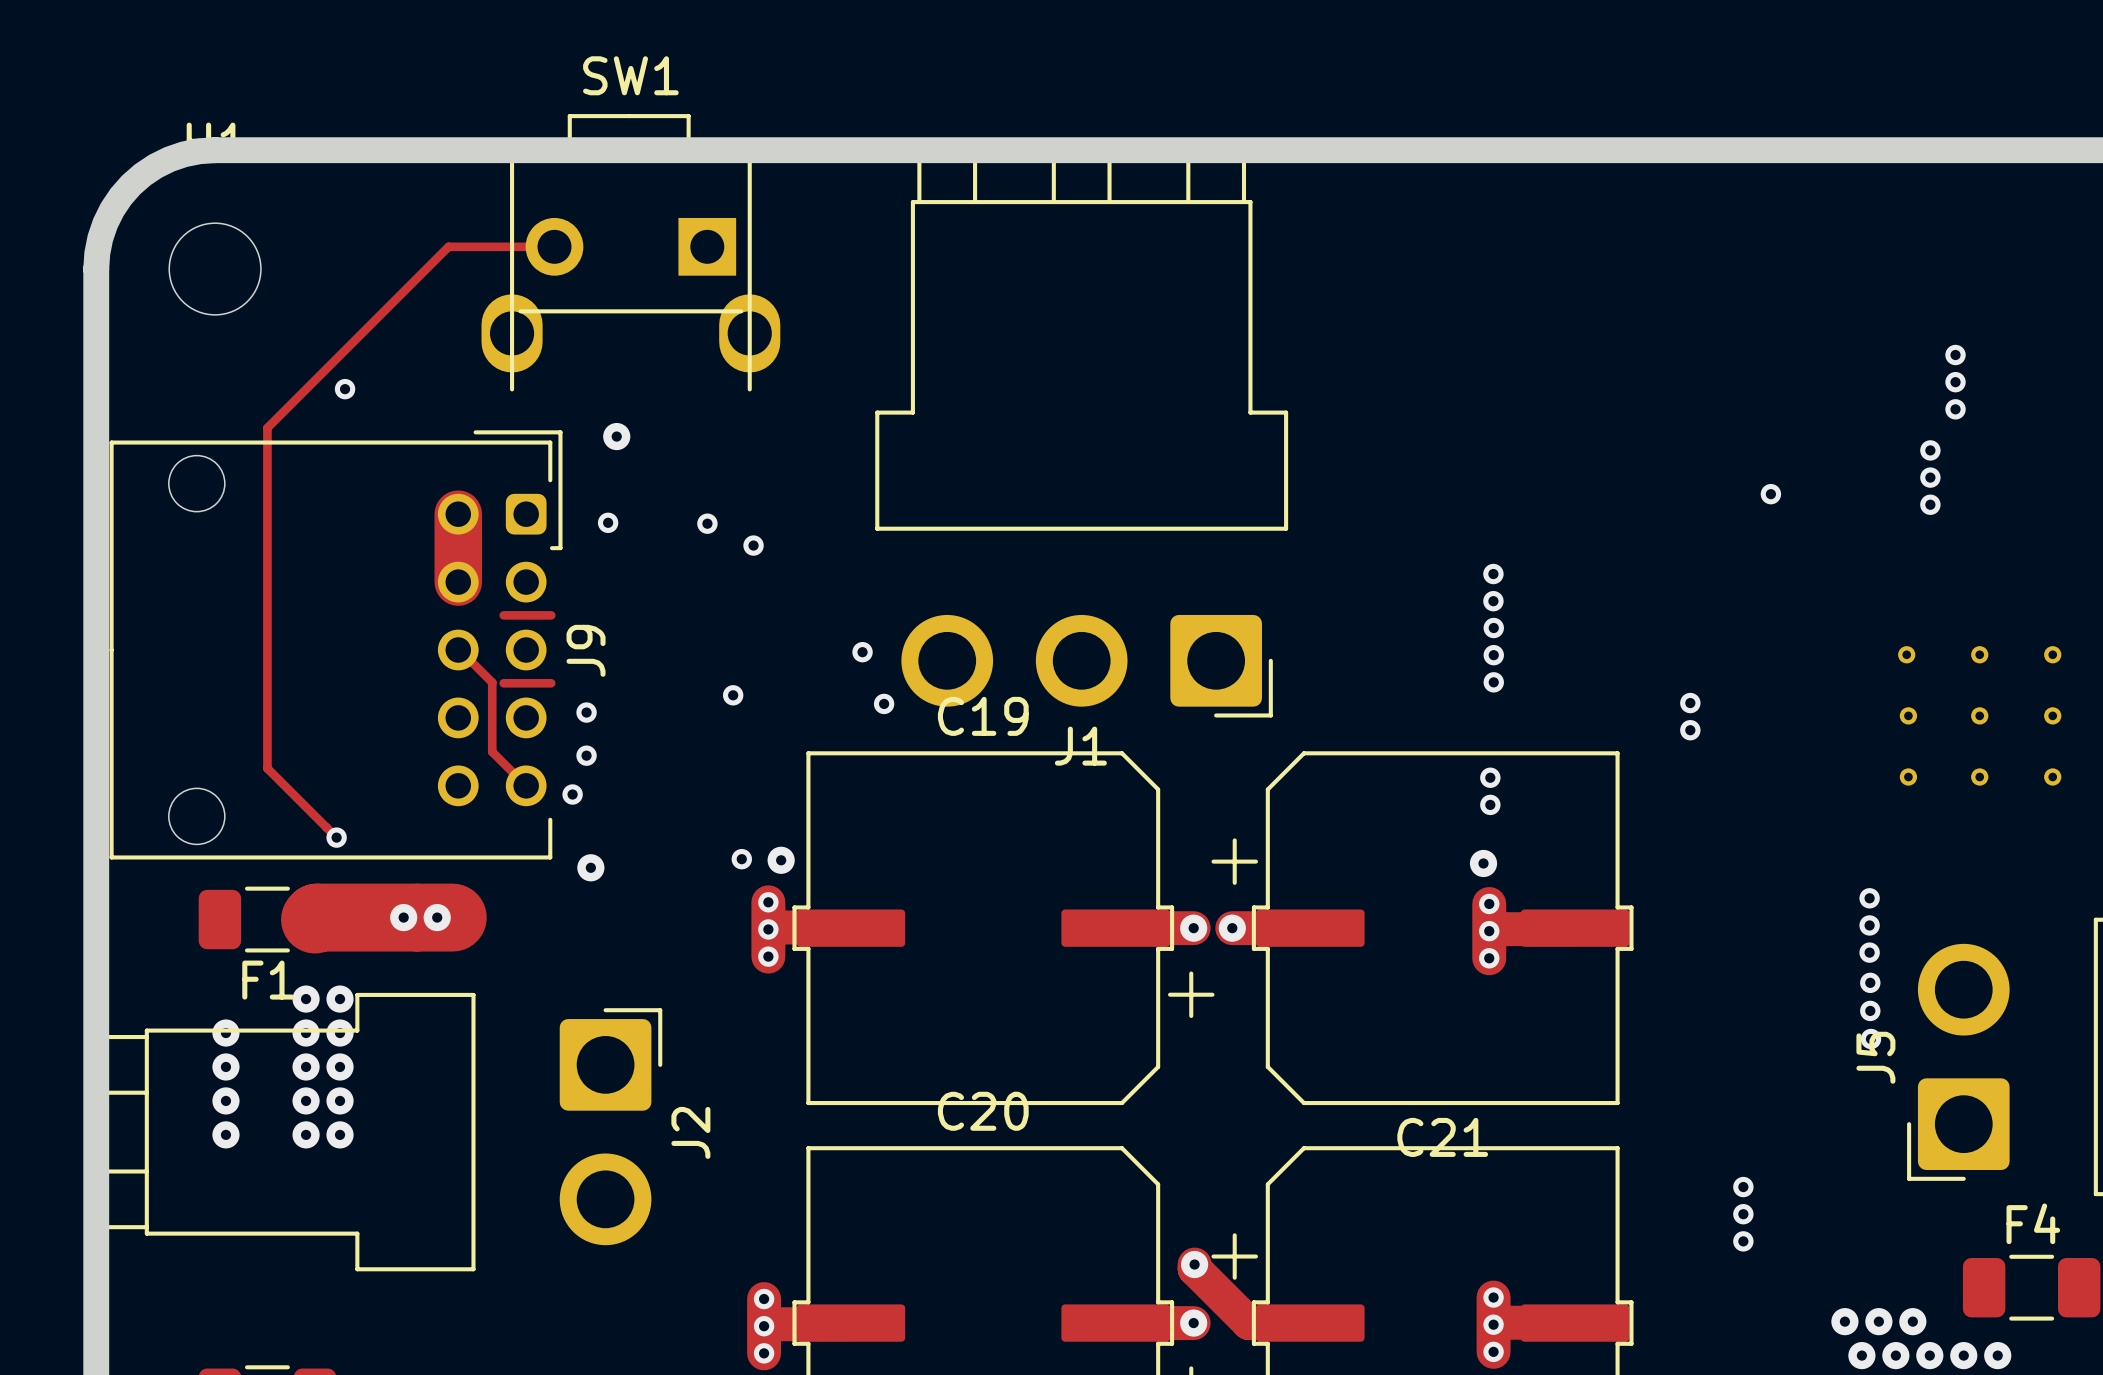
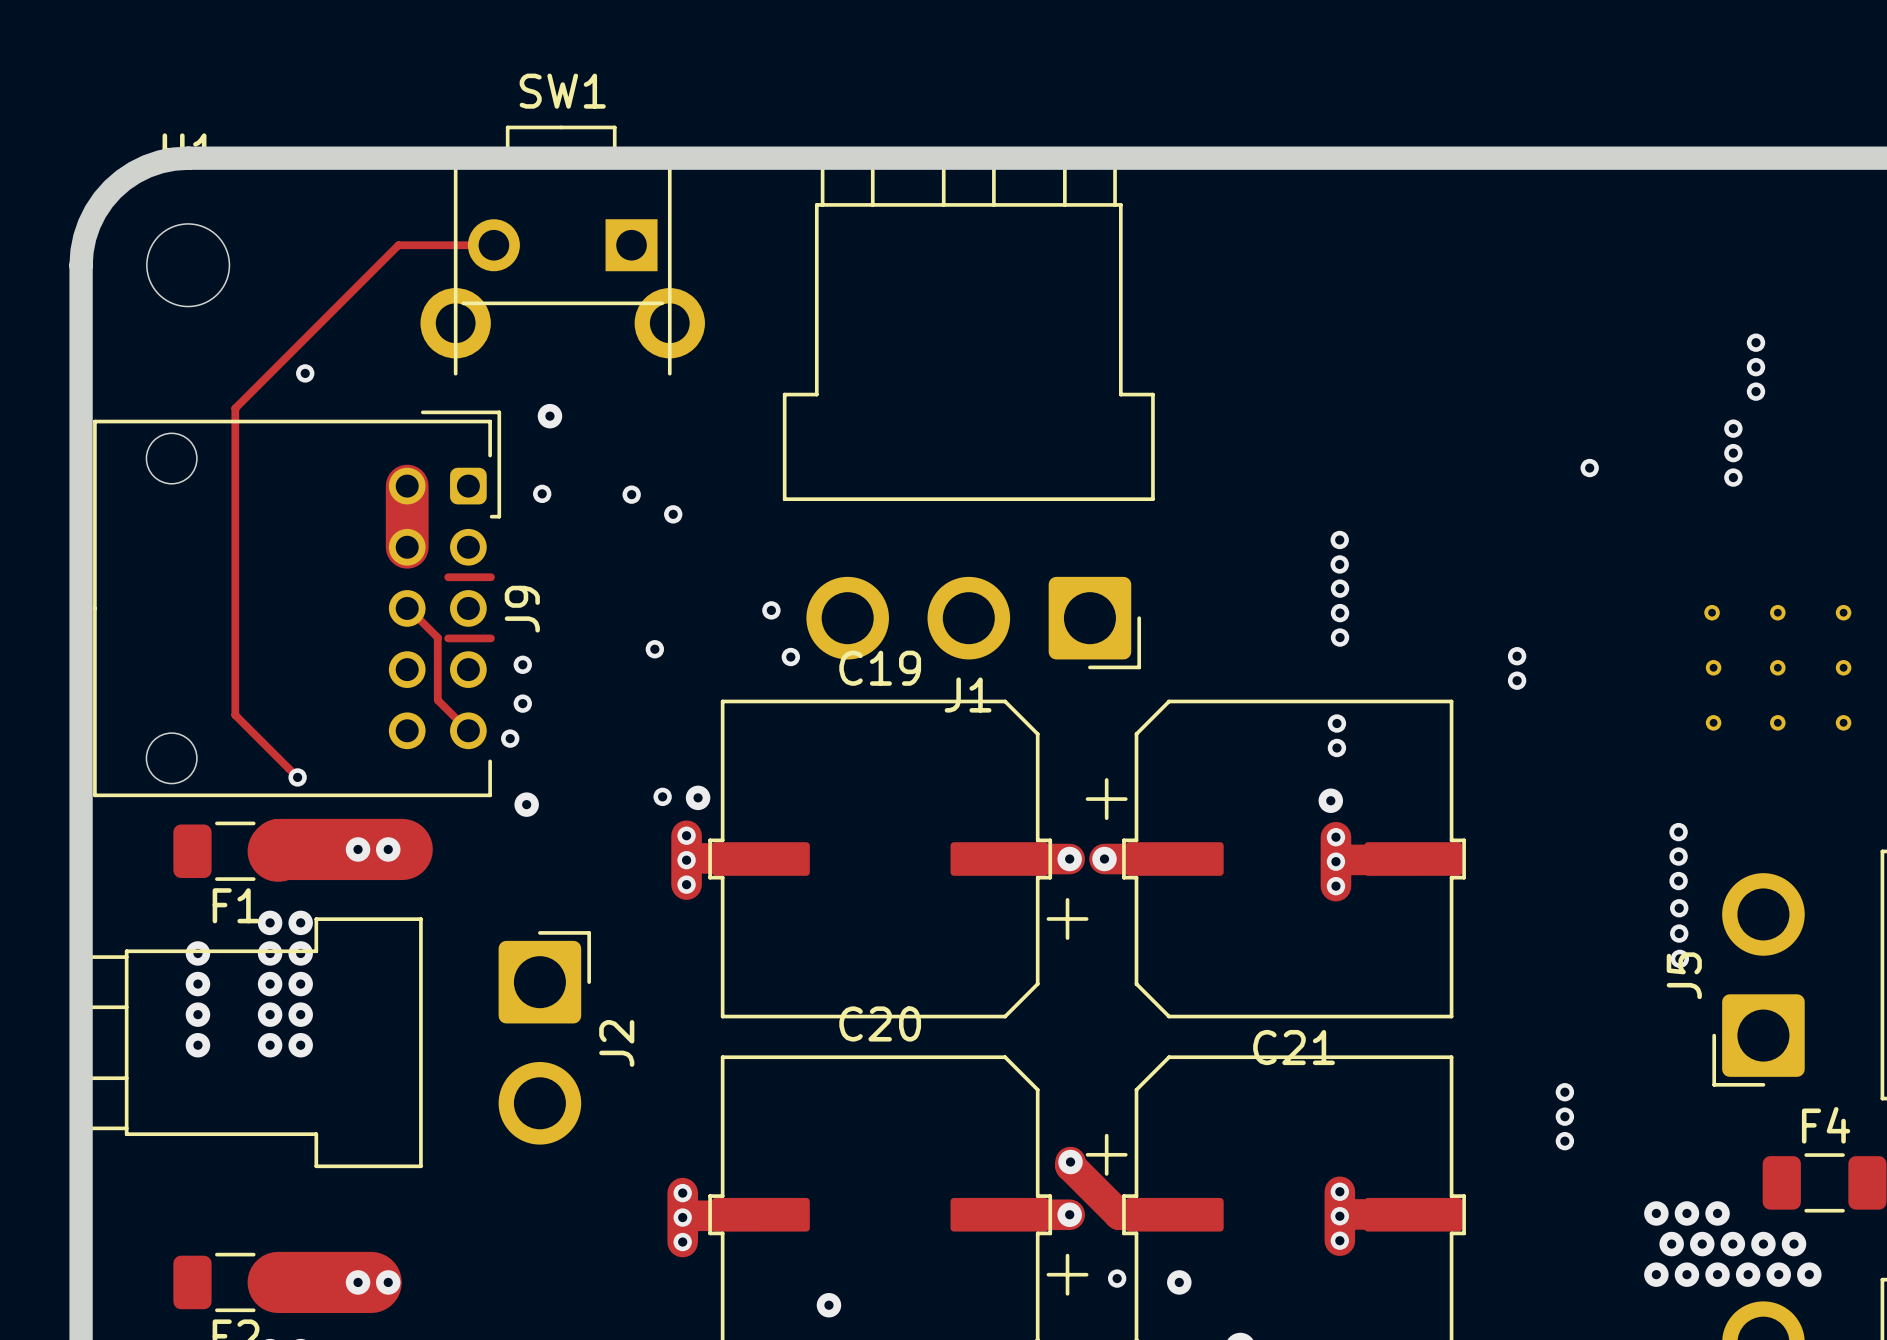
SW1 footprint: [481, 114, 781, 392] -> [420, 125, 705, 376]

